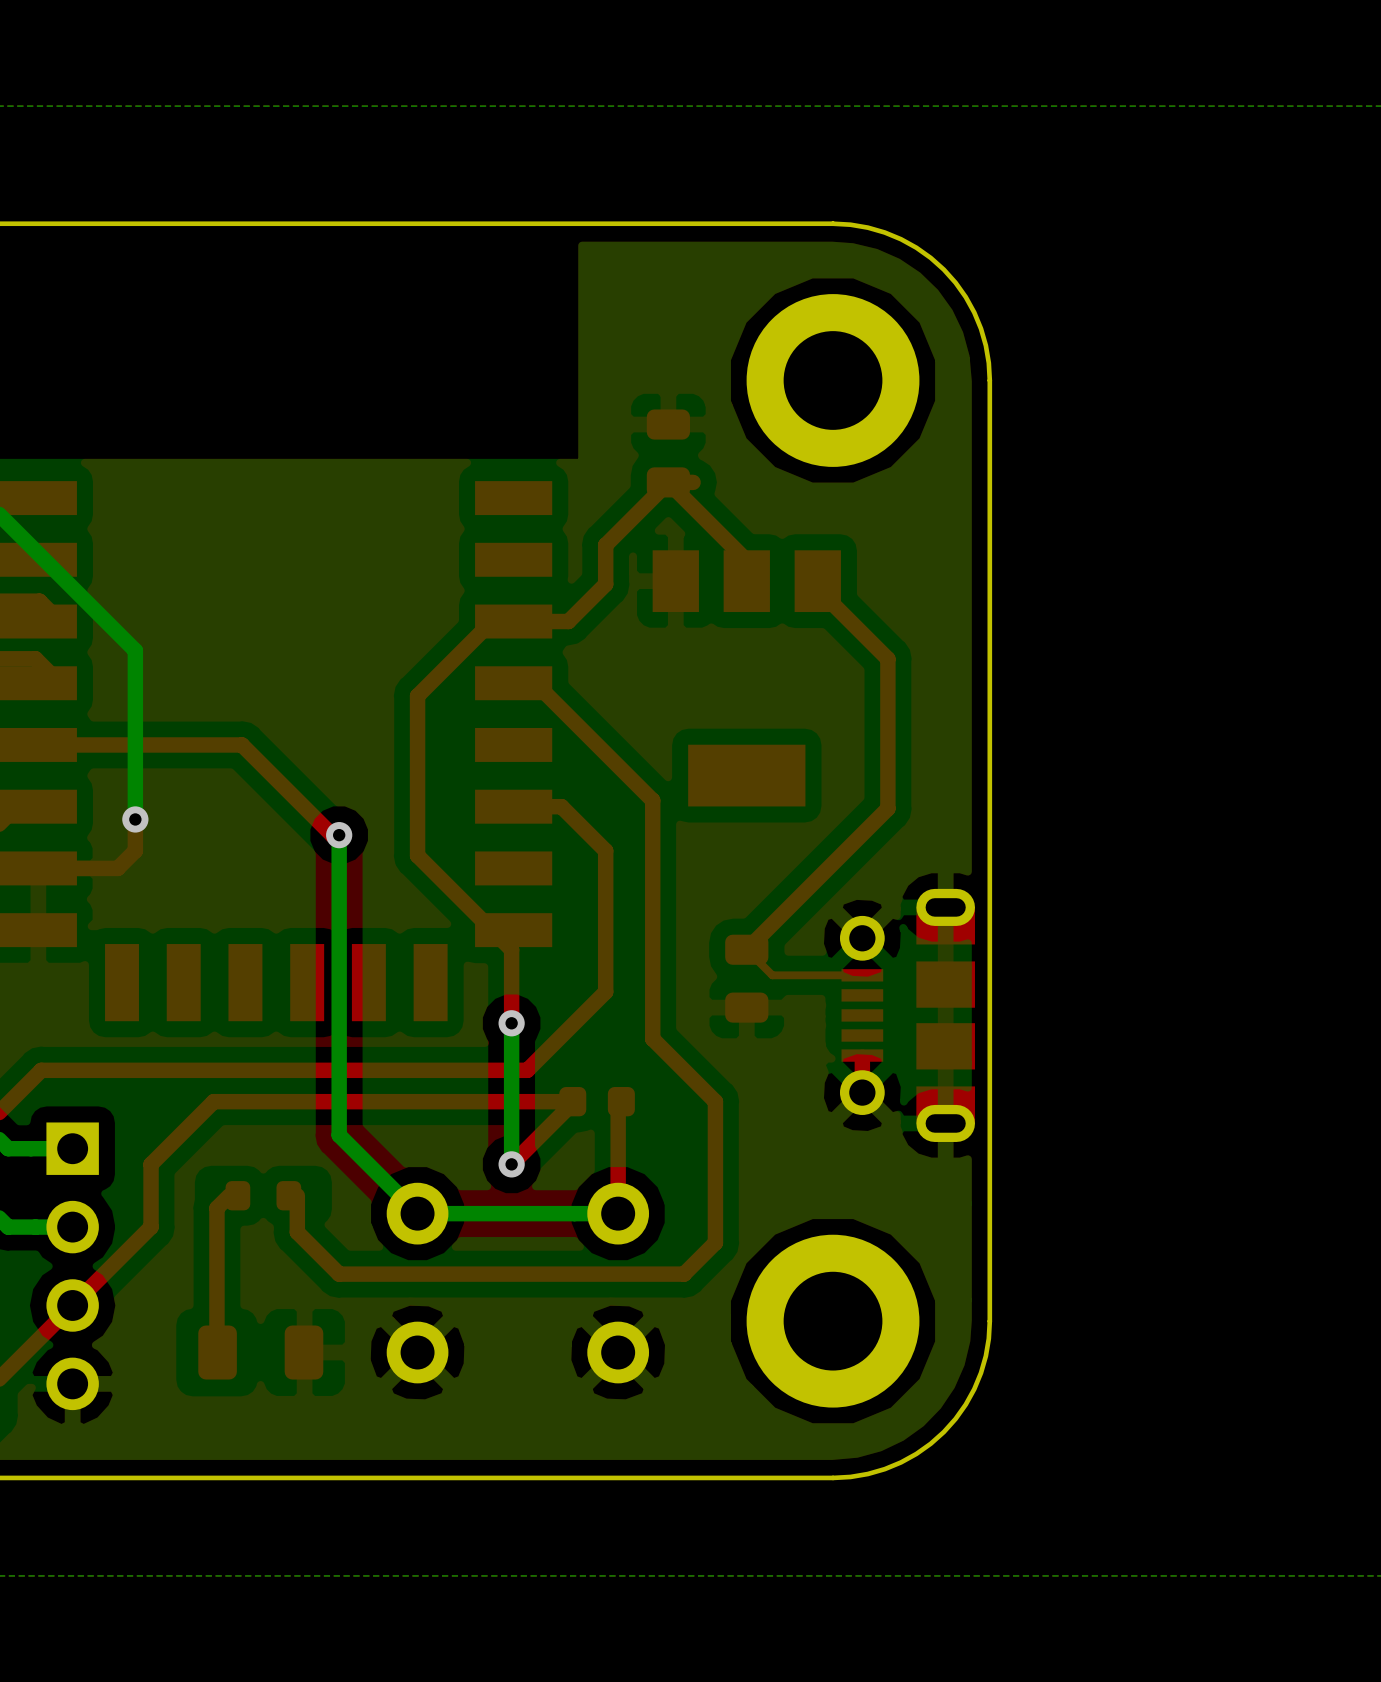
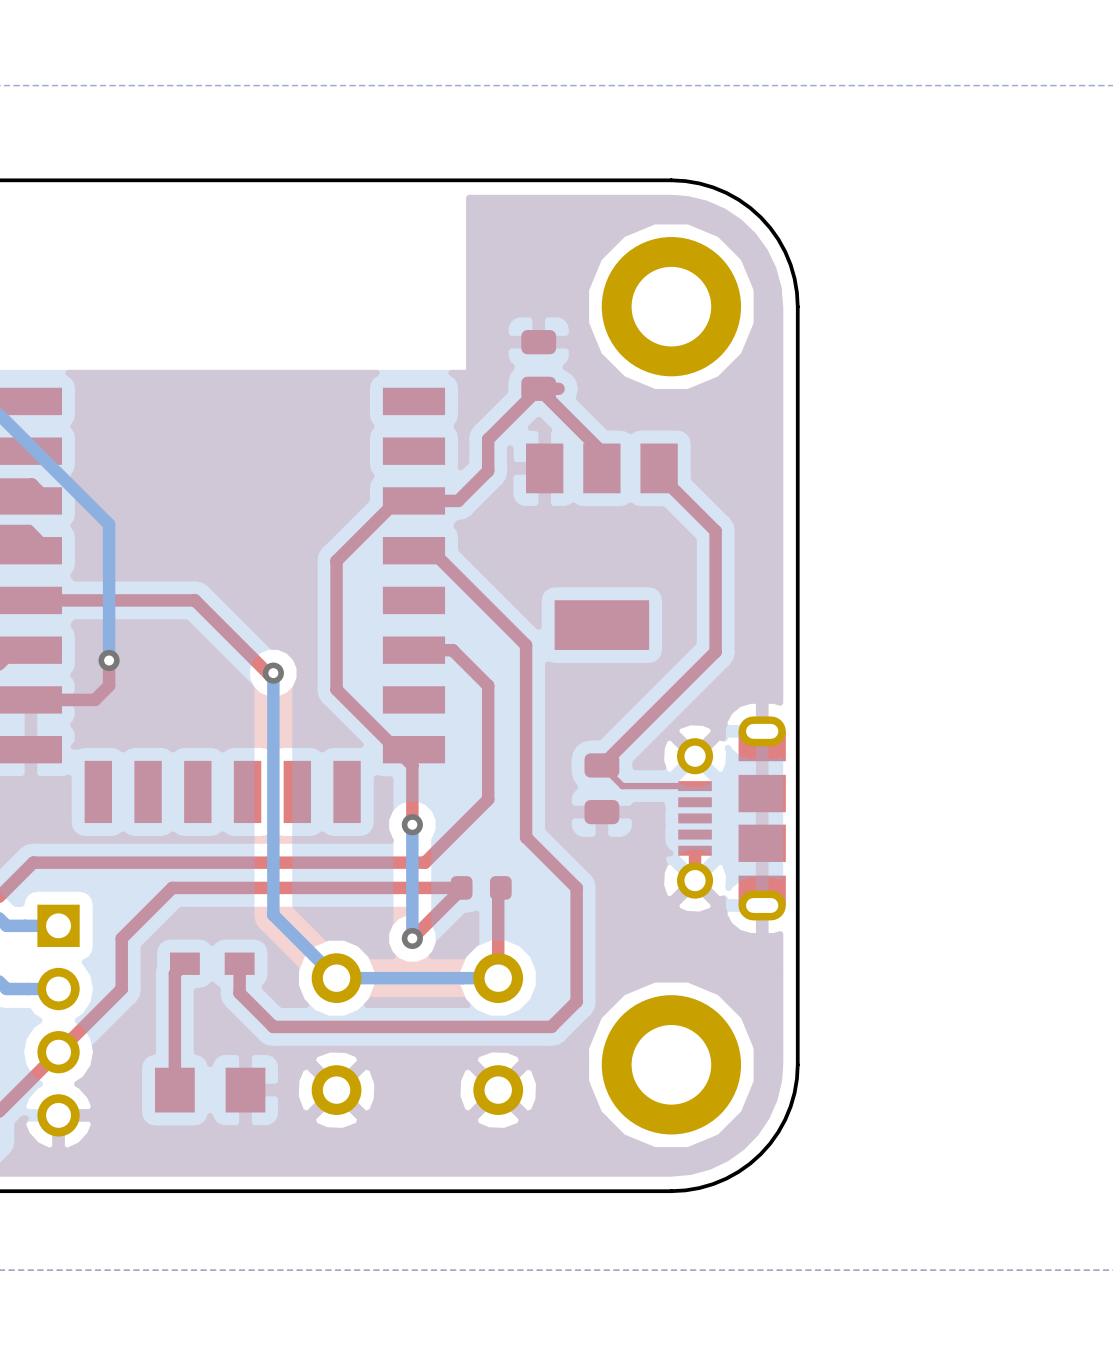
part footprint: [225, 1181, 302, 1211] -> [169, 952, 255, 975]
part footprint: [198, 1325, 324, 1380] -> [155, 1067, 266, 1113]

